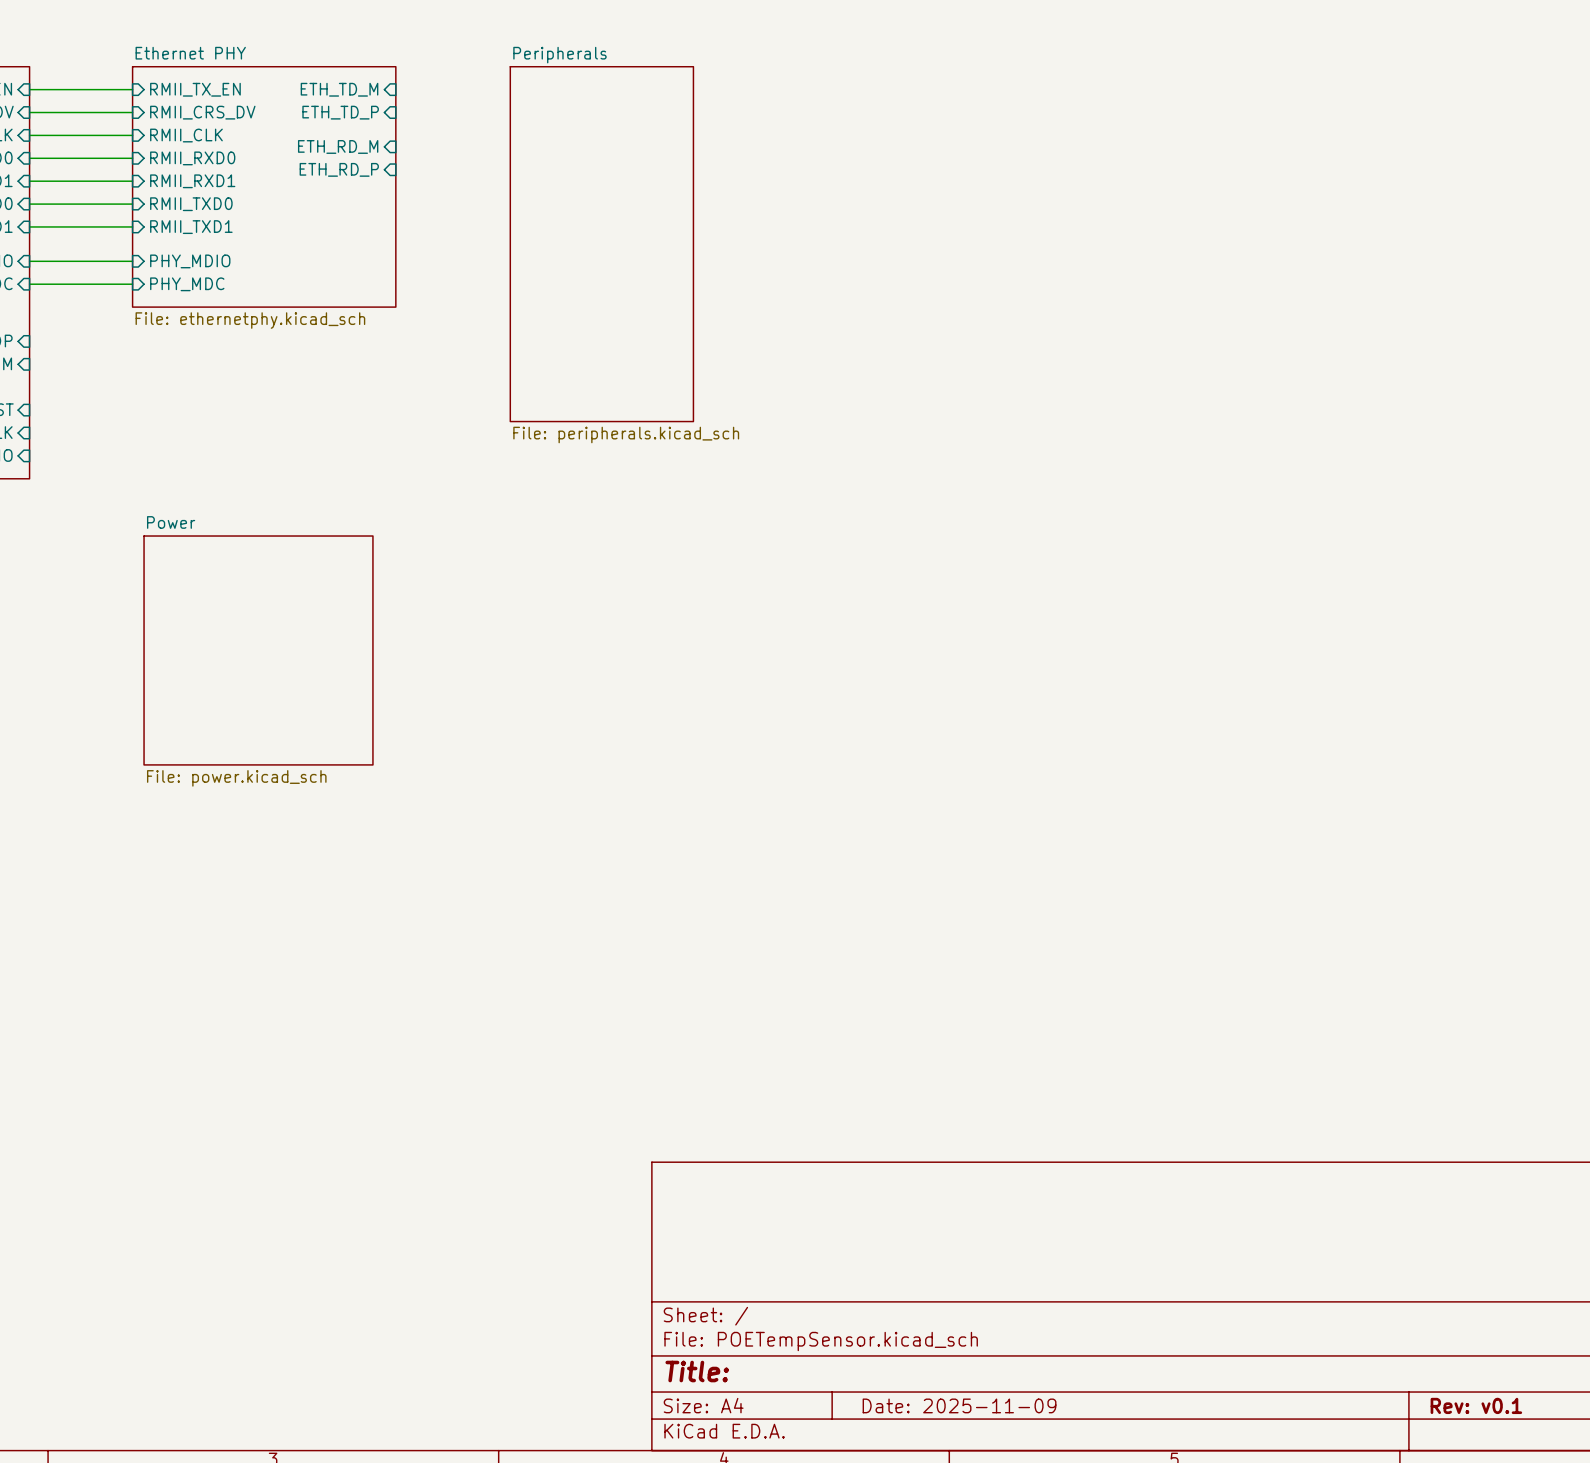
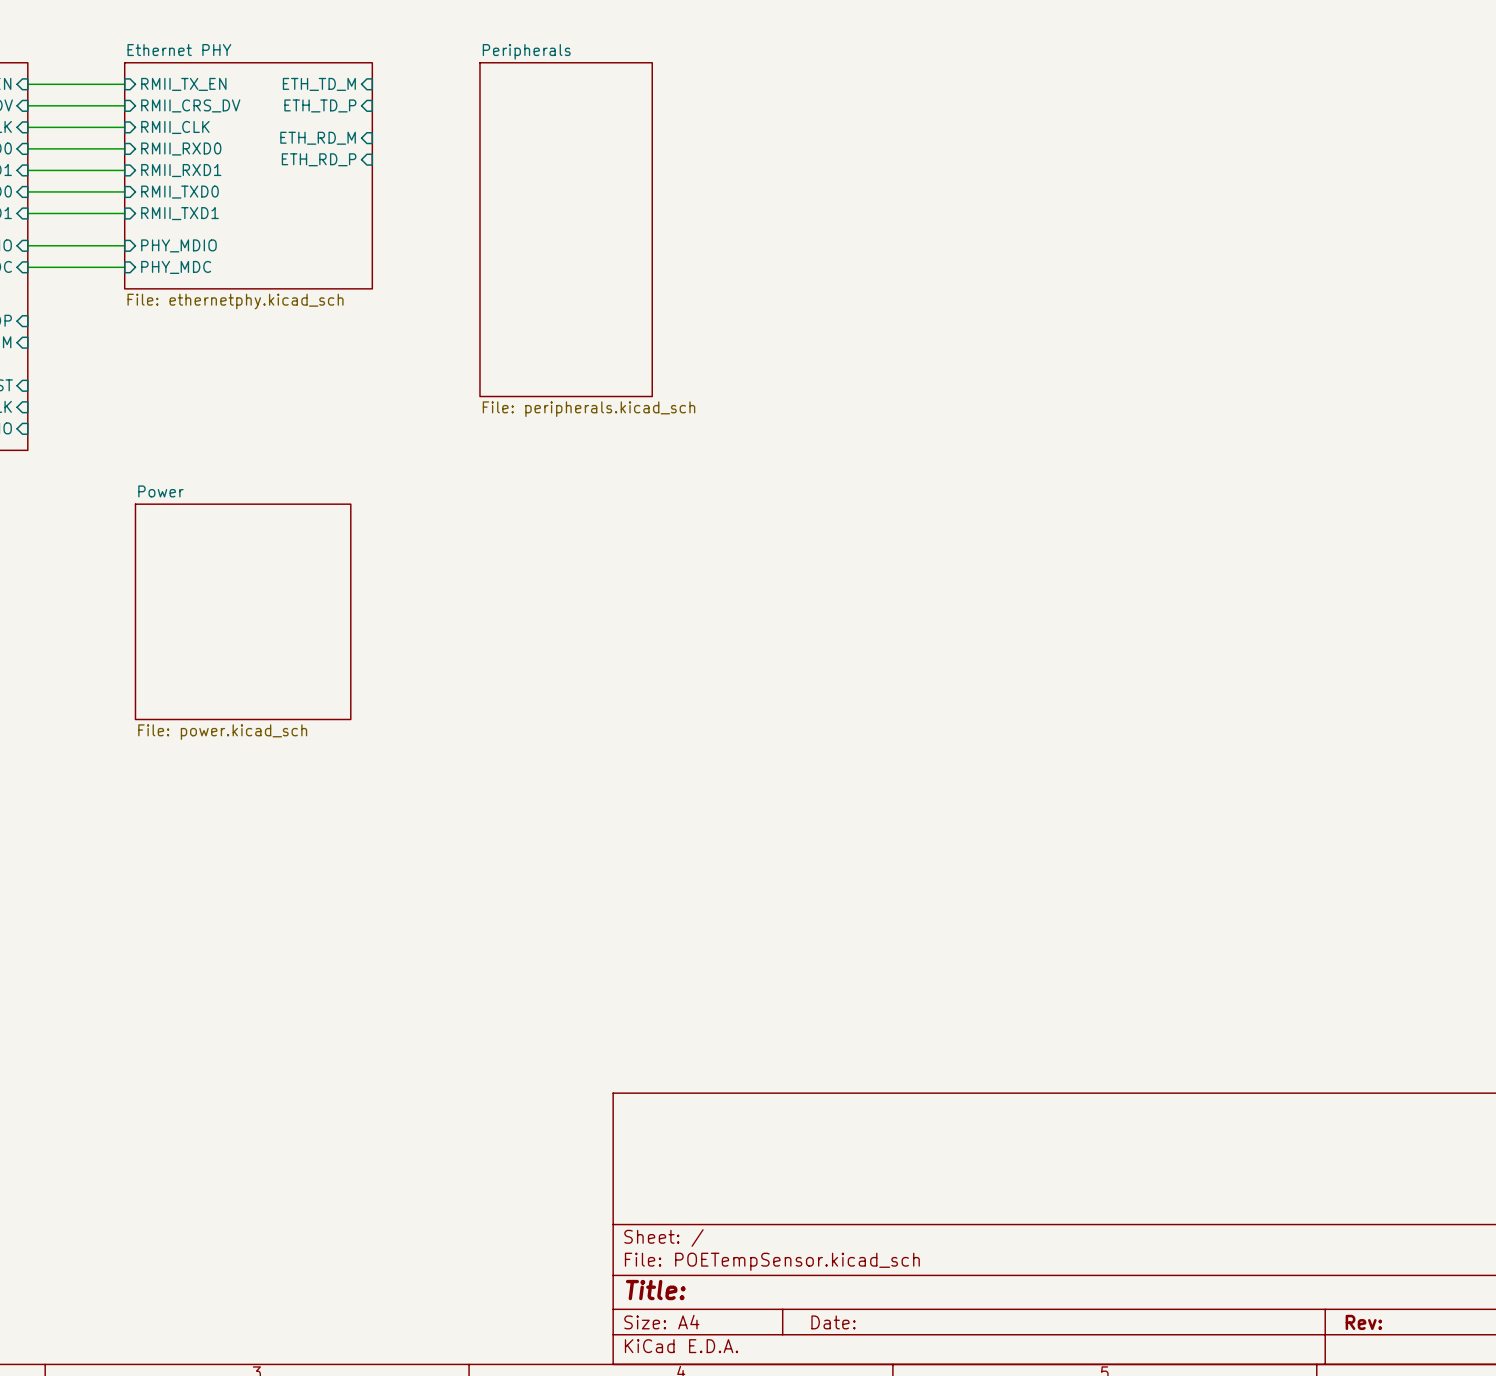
title block: Date: 2025-11-09 (959, 1405) -> Date: (833, 1322)
title block: Rev: v0.1 (1476, 1405) -> Rev: (1363, 1322)

